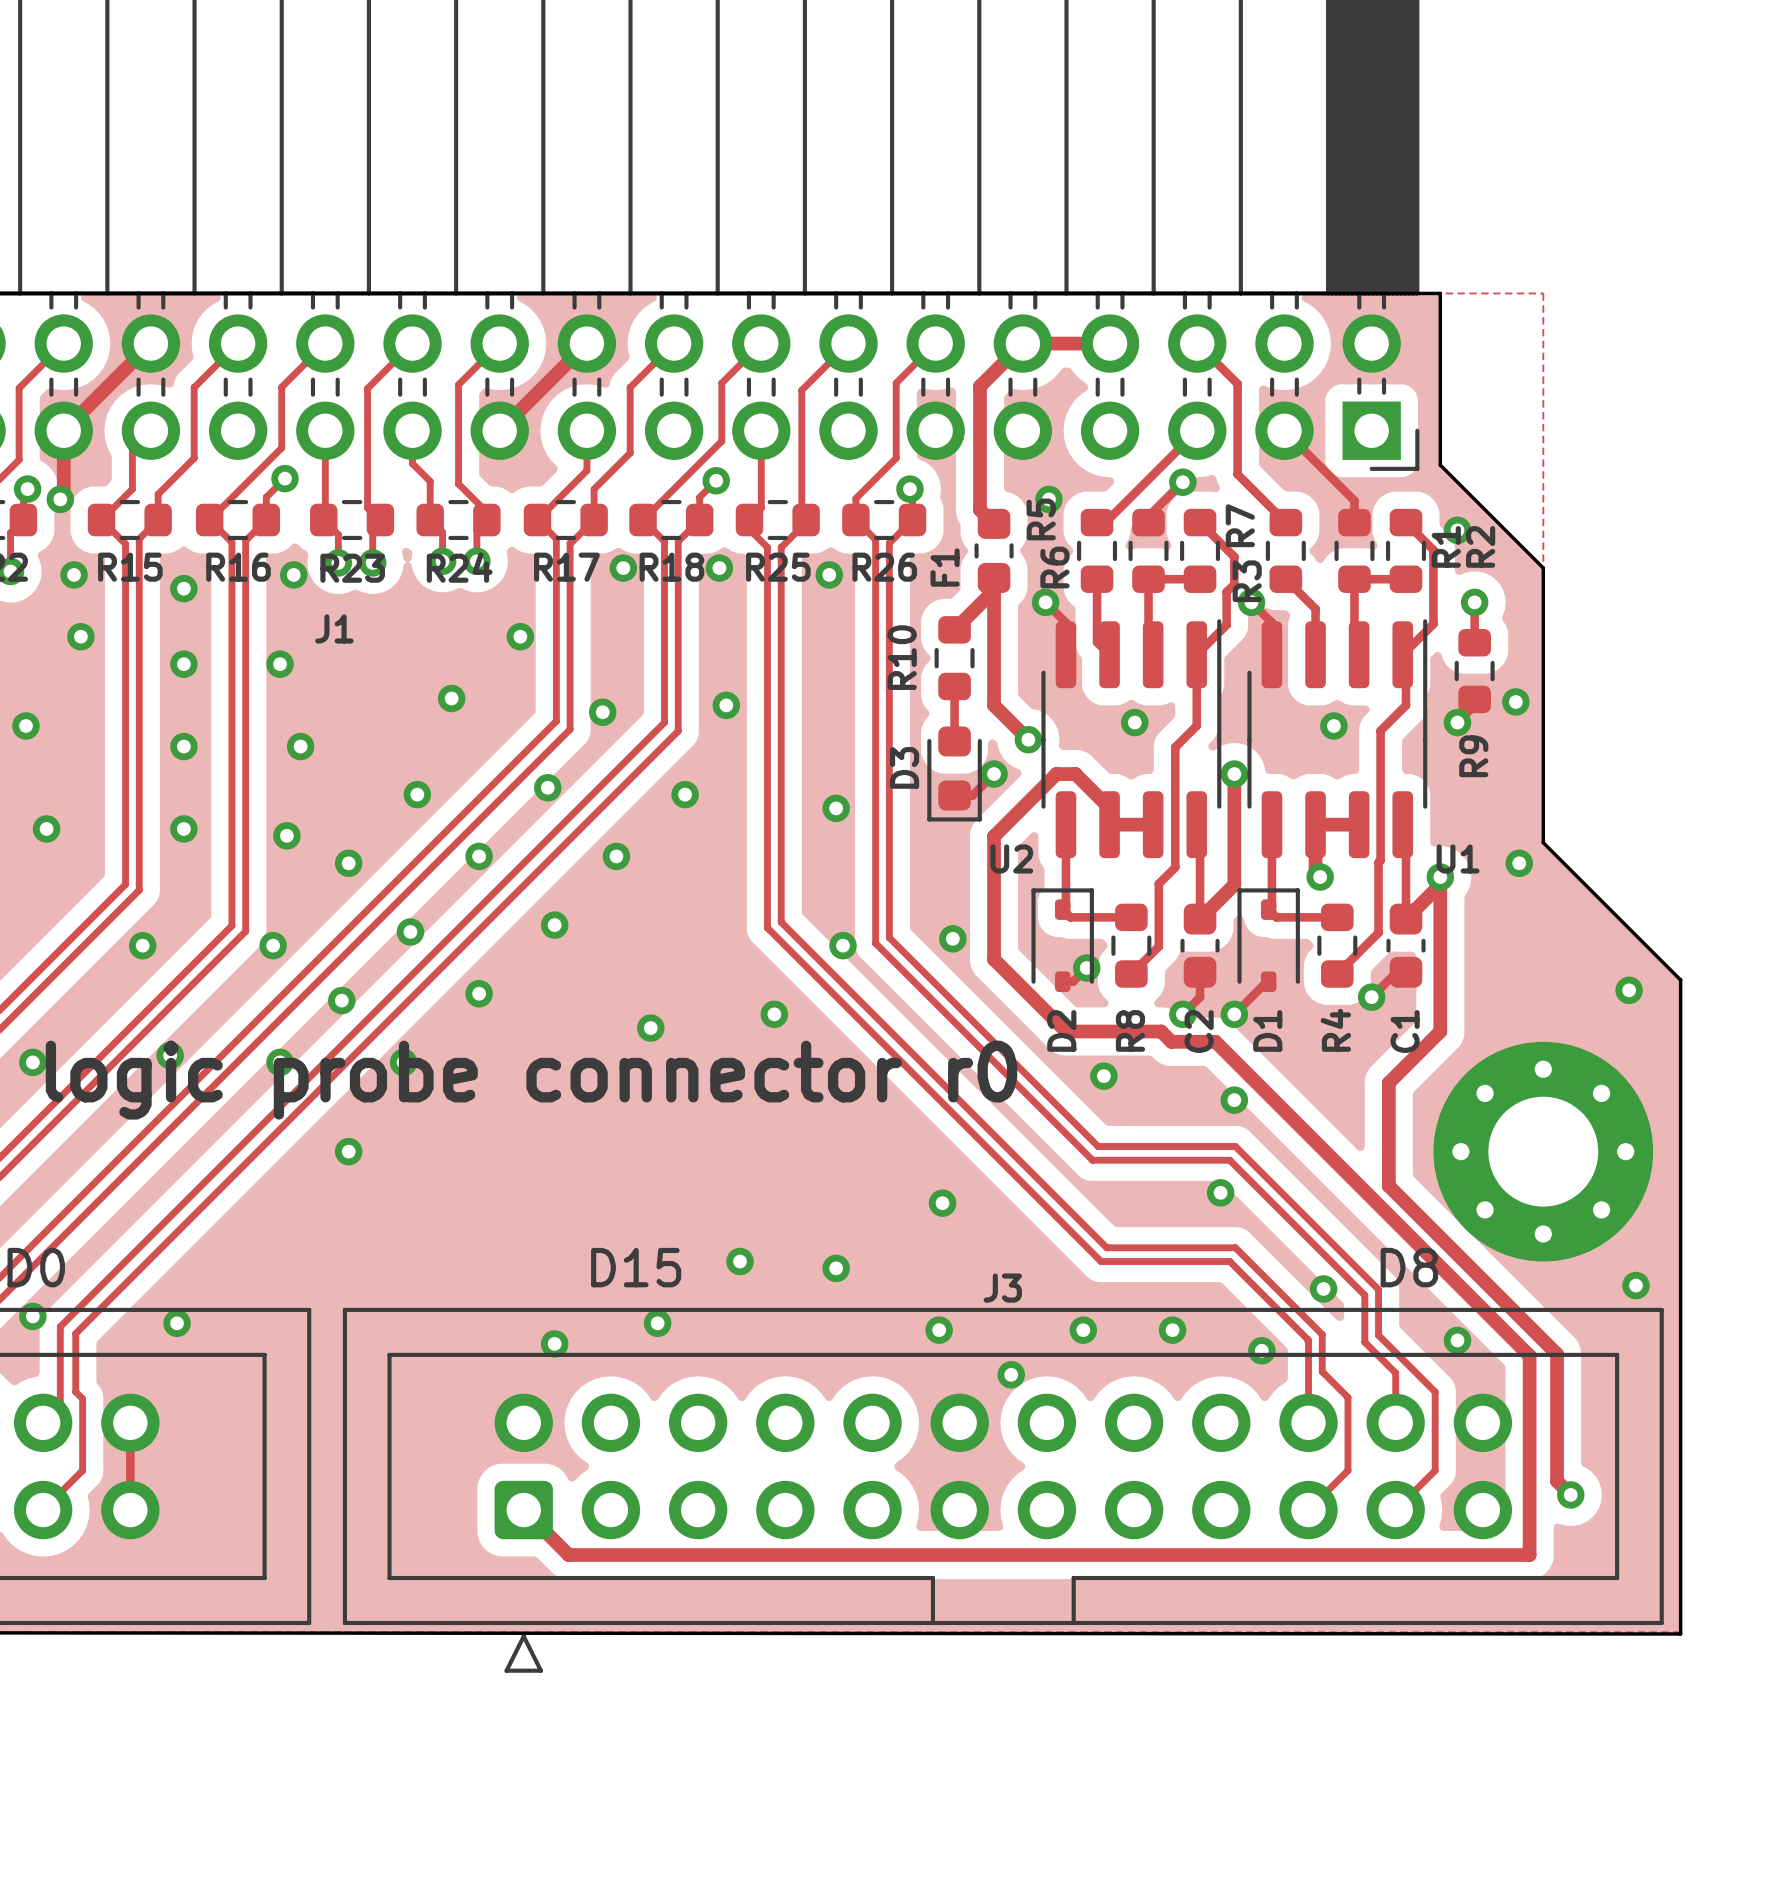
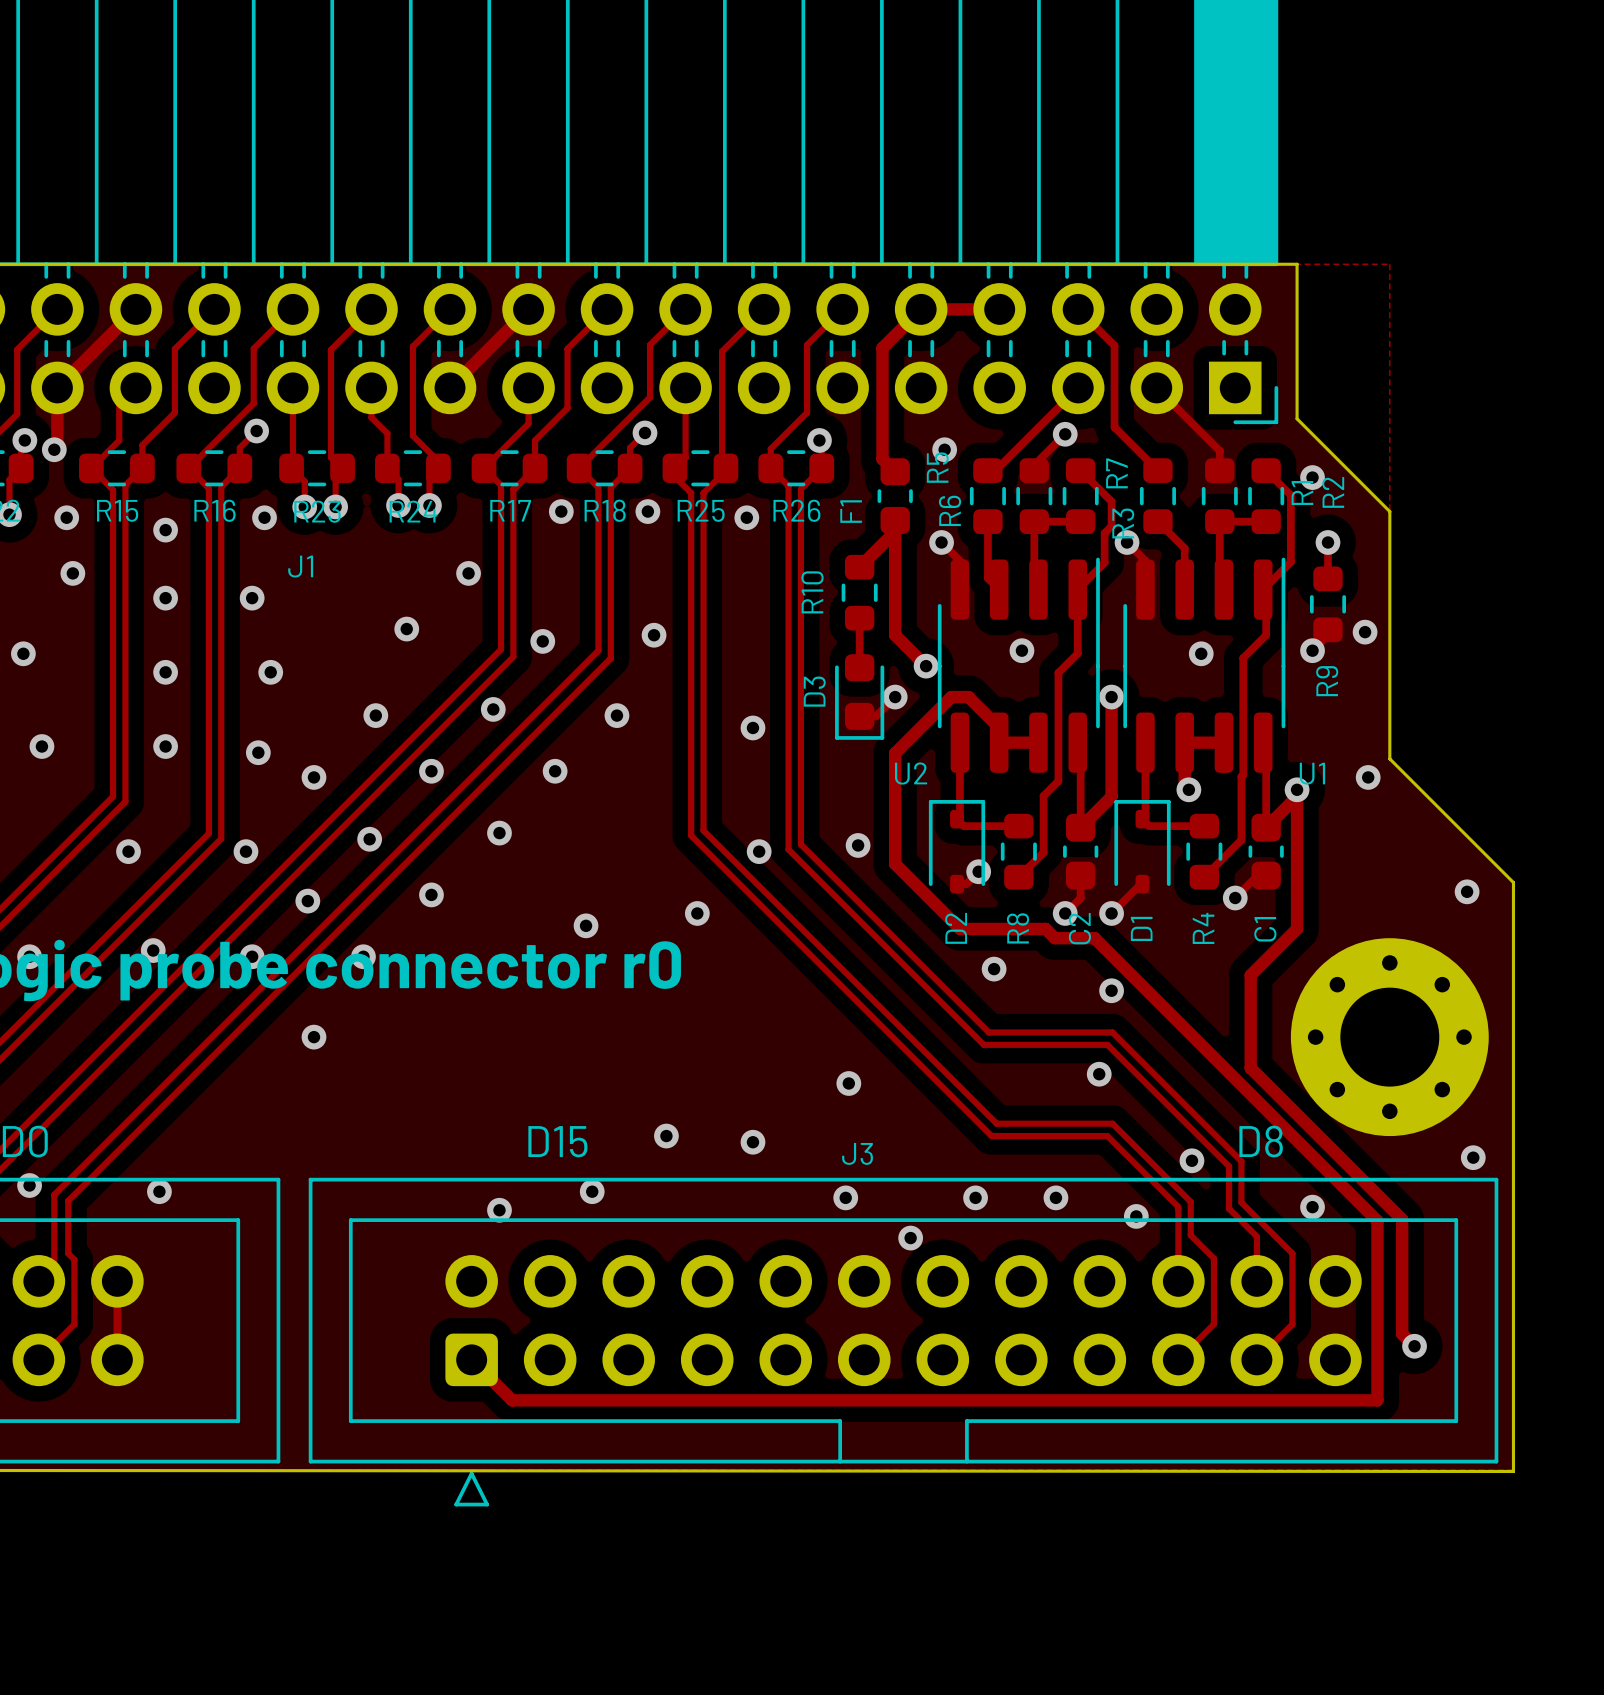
J3 name position: J3 (1002, 1288) -> J3 (857, 1153)

